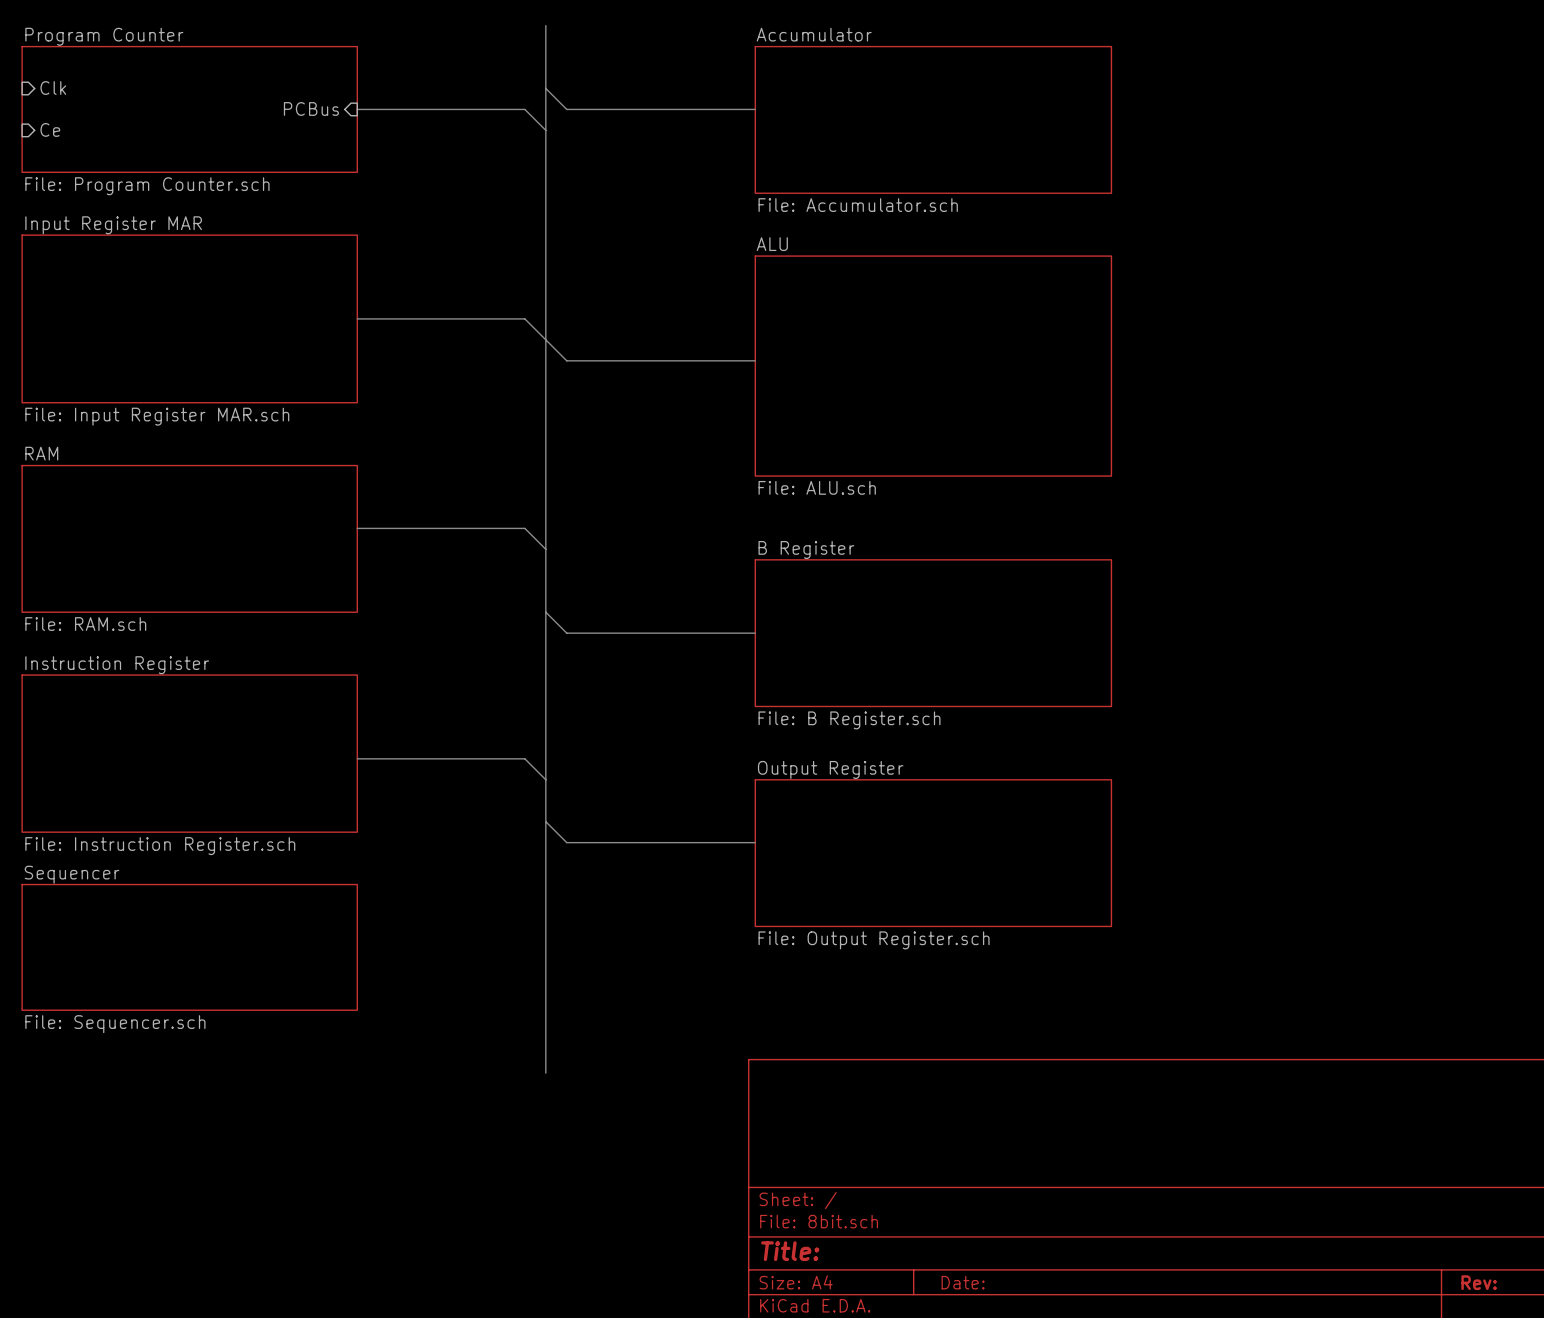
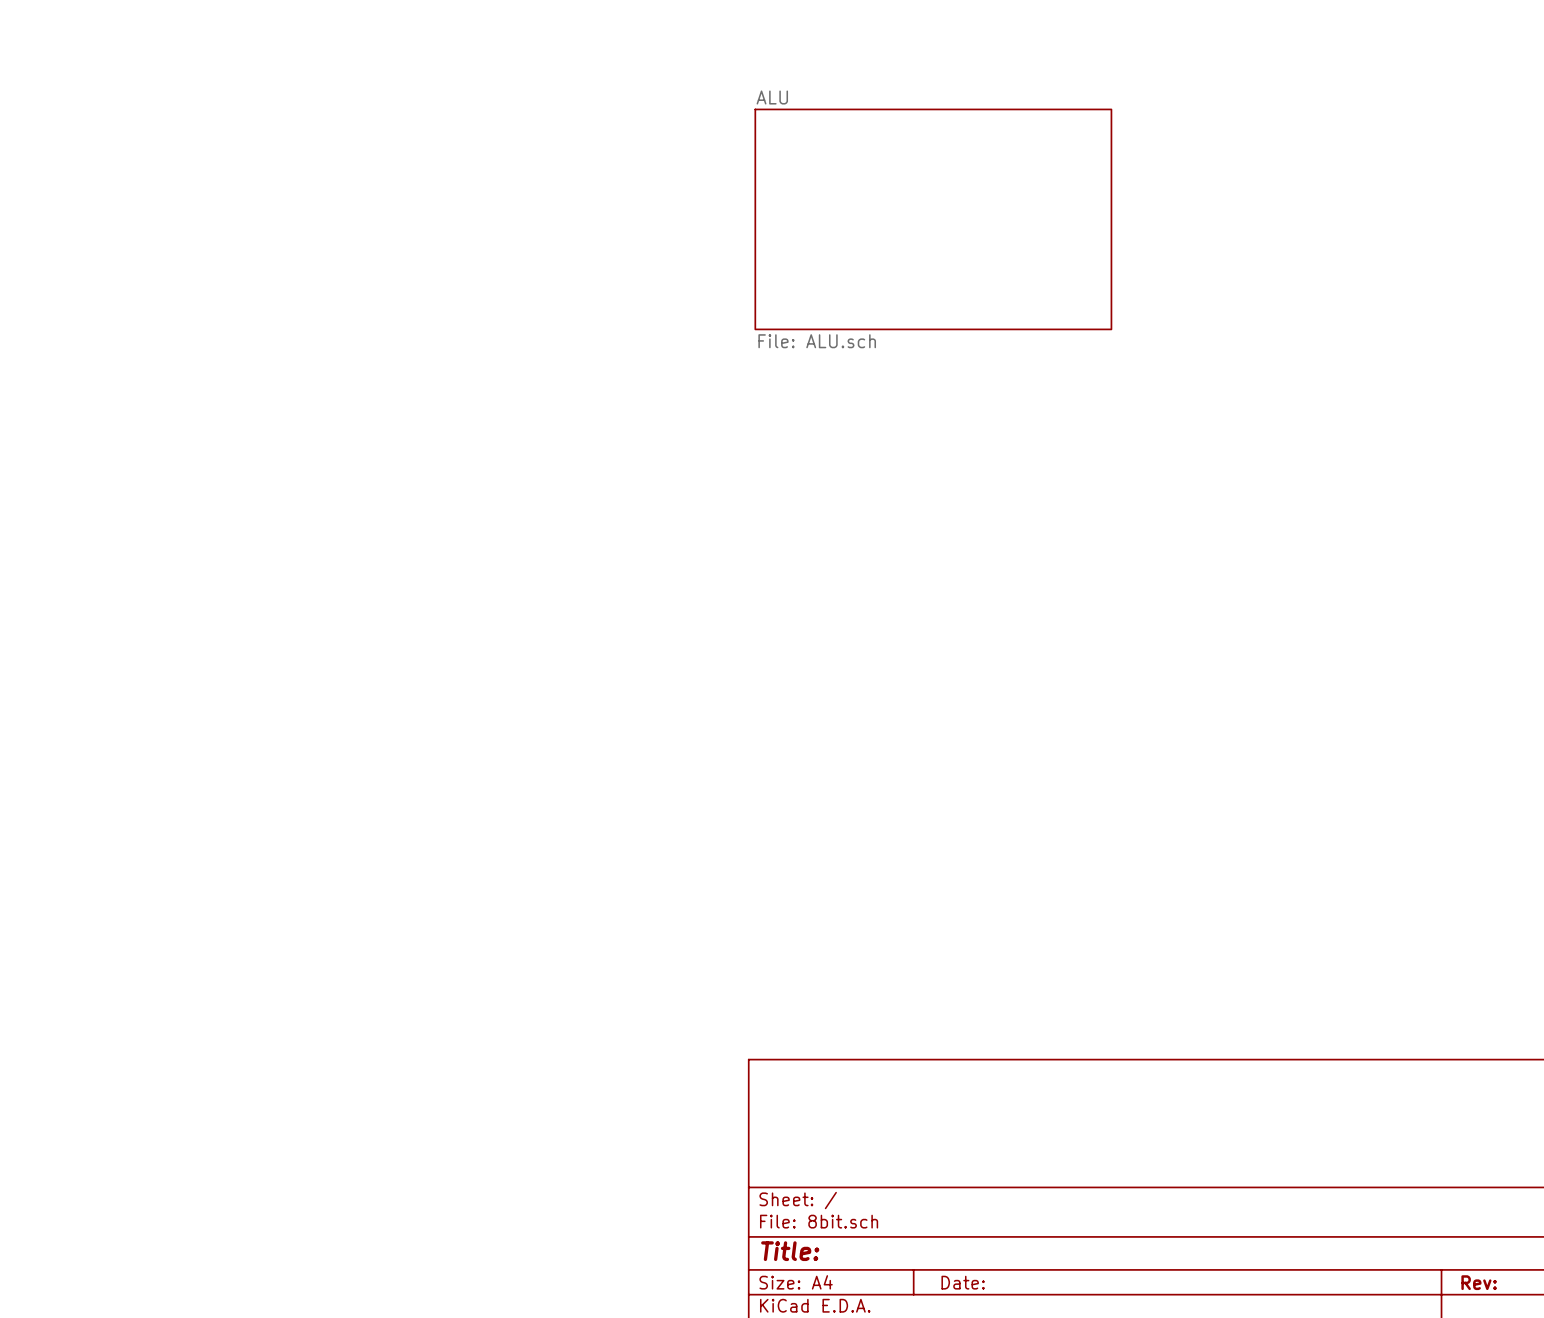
bus: (545, 25) (545, 1073) -> none
sheet pin: Clk (53, 88) -> none
bus: (545, 88) (566, 109) (755, 109) -> none
sheet pin: PCBus (311, 108) -> none
sheet Program Counter: File: Program Counter.sch (189, 109) -> none
bus: (357, 109) (524, 109) (545, 130) -> none
sheet Accumulator: File: Accumulator.sch (933, 119) -> none
sheet pin: Ce (50, 129) -> none
sheet Input Register MAR: File: Input Register MAR.sch (189, 318) -> none
bus: (357, 318) (524, 318) (566, 360) (755, 360) -> none
sheet ALU position: (933, 366) -> (933, 219)
bus: (357, 528) (524, 528) (545, 549) -> none
sheet RAM: File: RAM.sch (189, 538) -> none
bus: (545, 612) (566, 633) (755, 633) -> none
sheet B Register: File: B Register.sch (933, 633) -> none
sheet Instruction Register: File: Instruction Register.sch (189, 753) -> none
bus: (357, 758) (524, 758) (545, 779) -> none
bus: (545, 821) (566, 842) (755, 842) -> none
sheet Output Register: File: Output Register.sch (933, 853) -> none
sheet Sequencer: File: Sequencer.sch (189, 947) -> none

